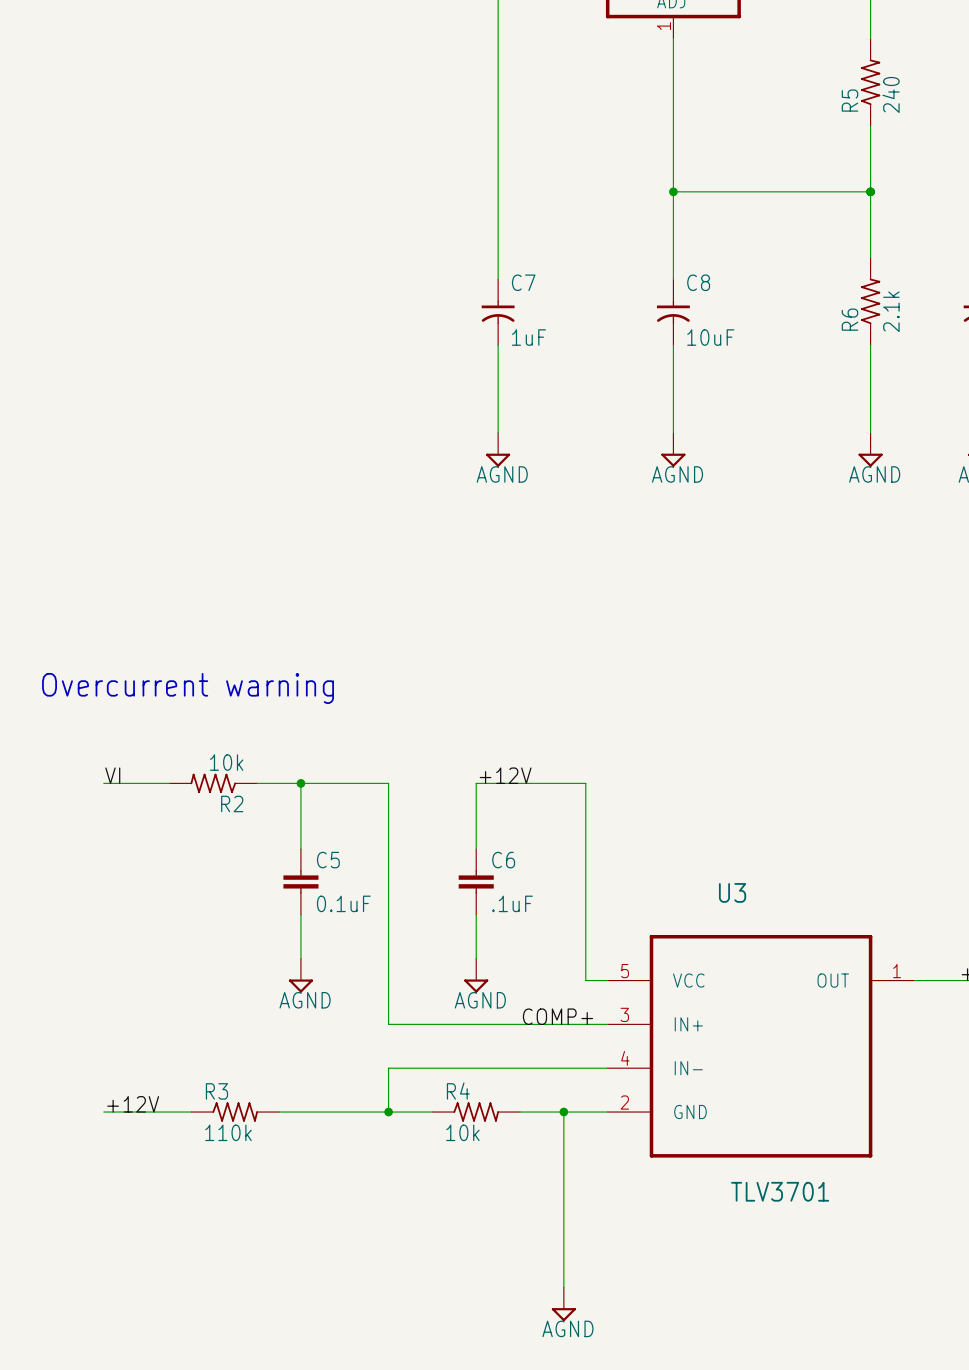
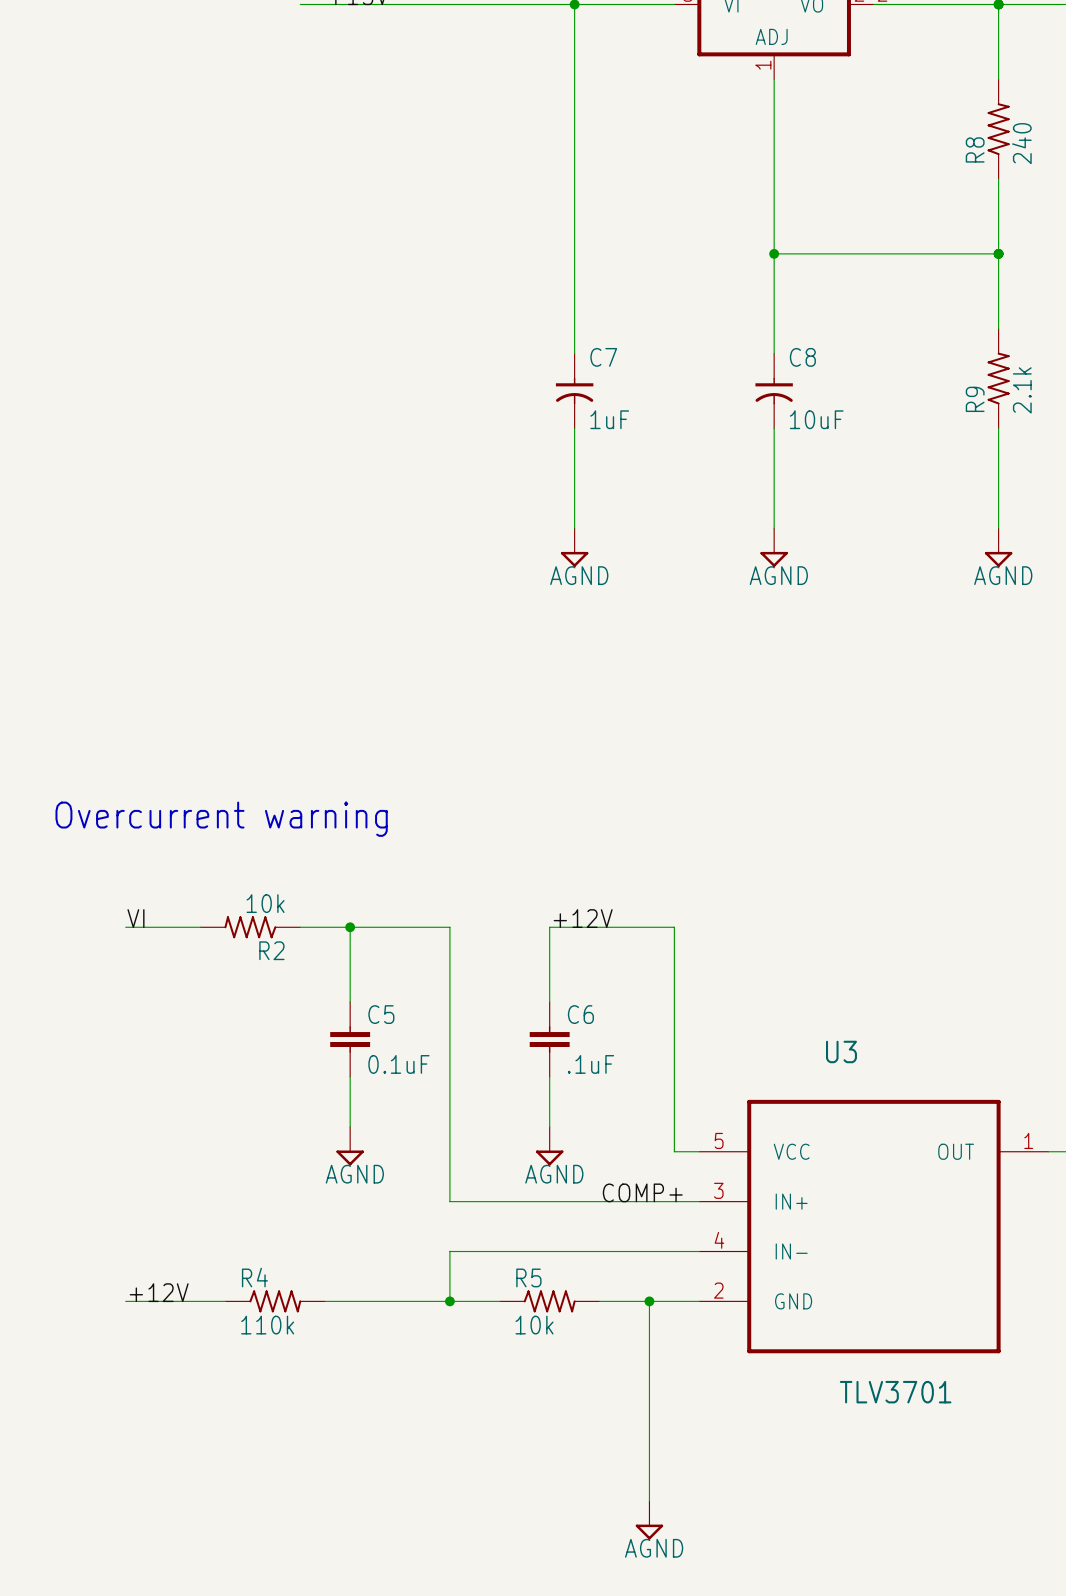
R5 name: R5 (849, 100) -> R8 (975, 149)
R6 name: R6 (849, 319) -> R9 (975, 399)
R3 name: R3 (216, 1091) -> R4 (254, 1277)
R4 name: R4 (458, 1091) -> R5 (528, 1277)

